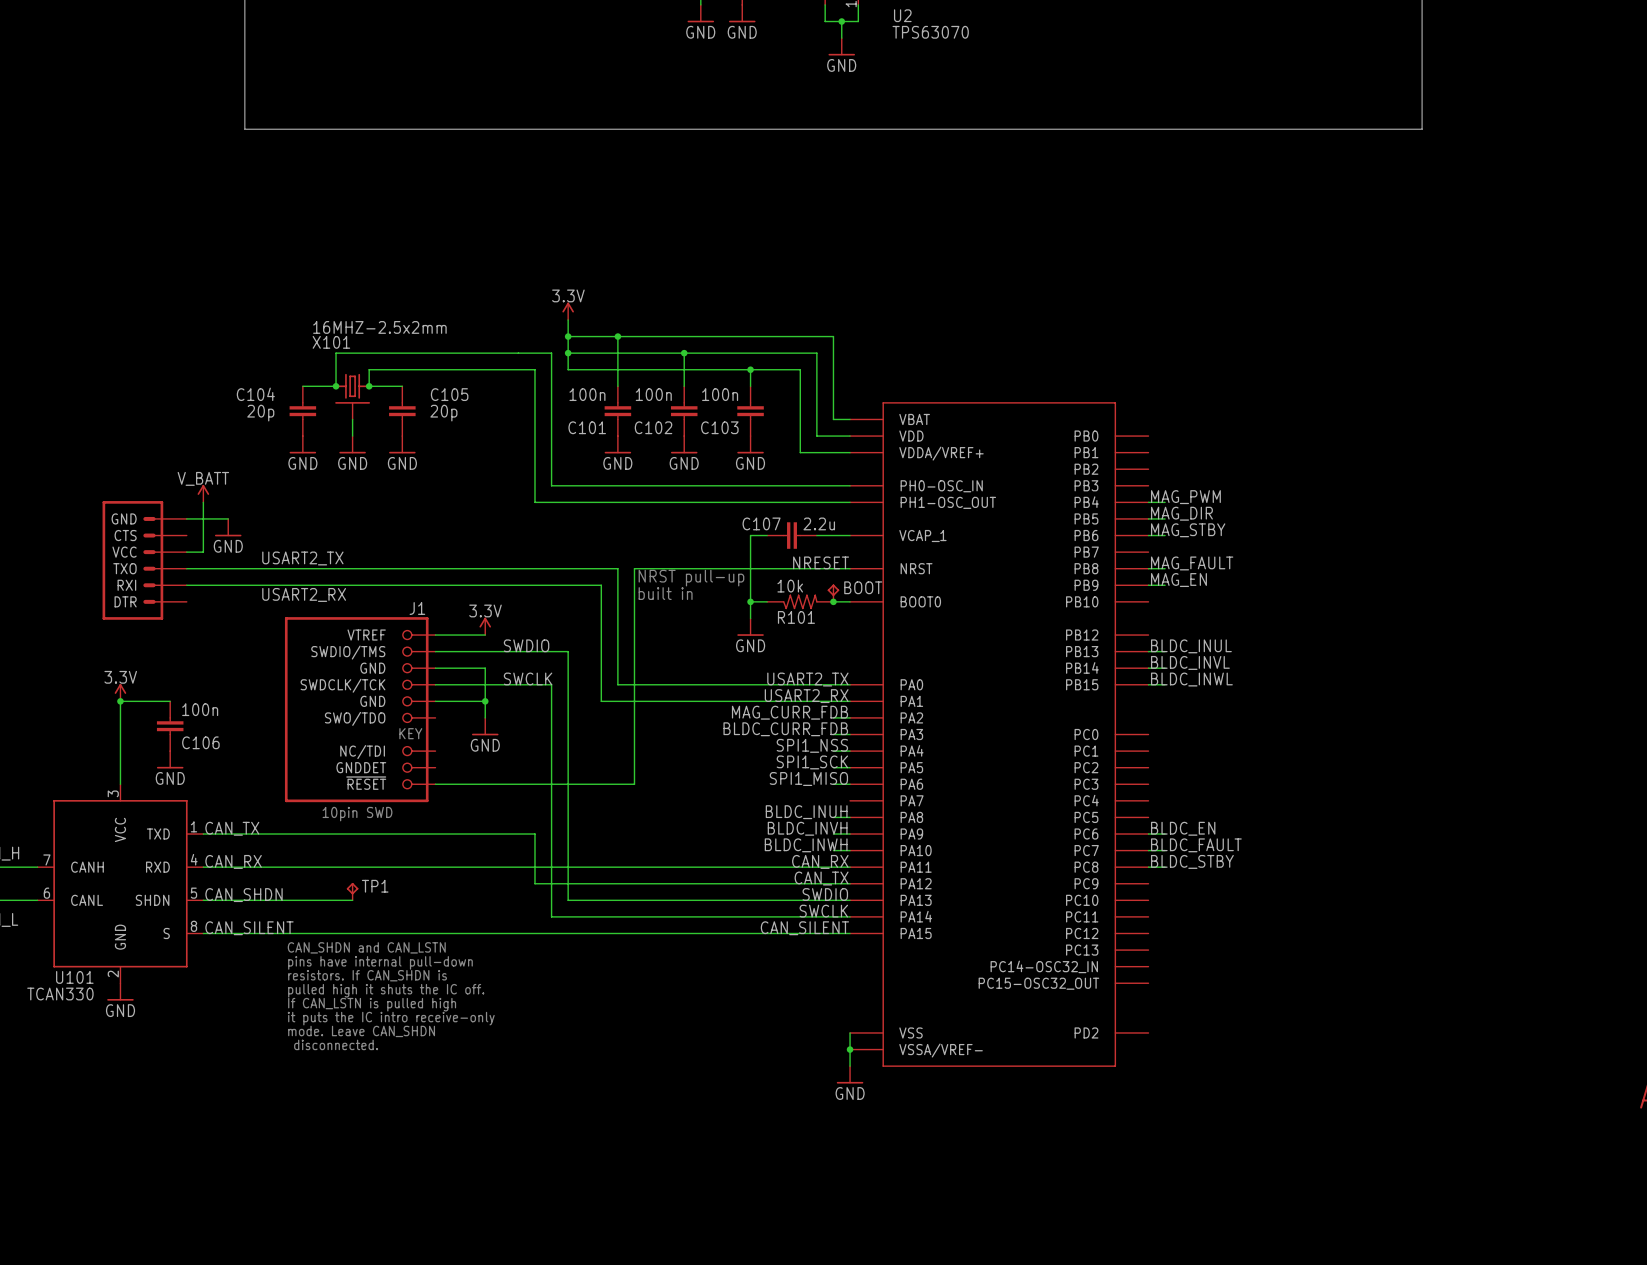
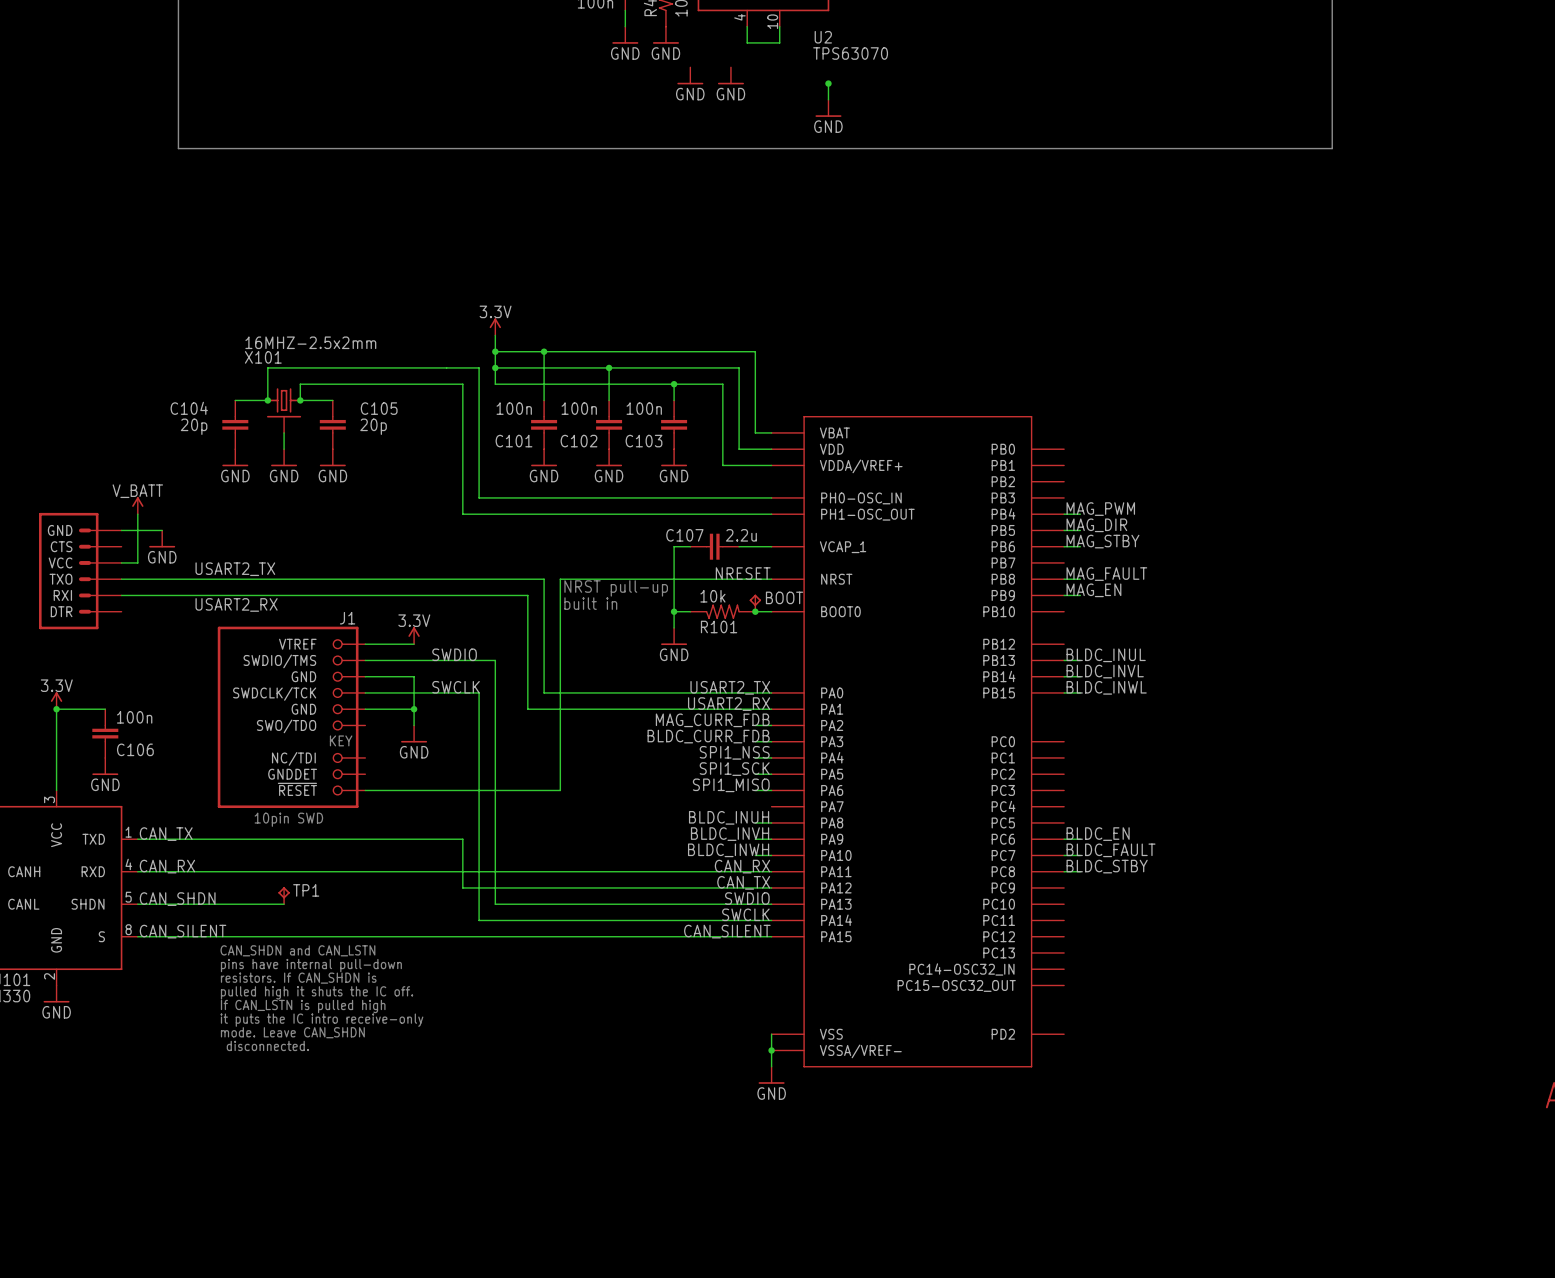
wire: (841, 21) (841, 38) -> (828, 83) (828, 99)
junction: (841, 21) -> none
power symbol position: GND (841, 46) -> GND (730, 75)
power symbol: none -> GND (690, 75)
junction: none -> (828, 83)
power symbol: none -> GND (828, 108)

